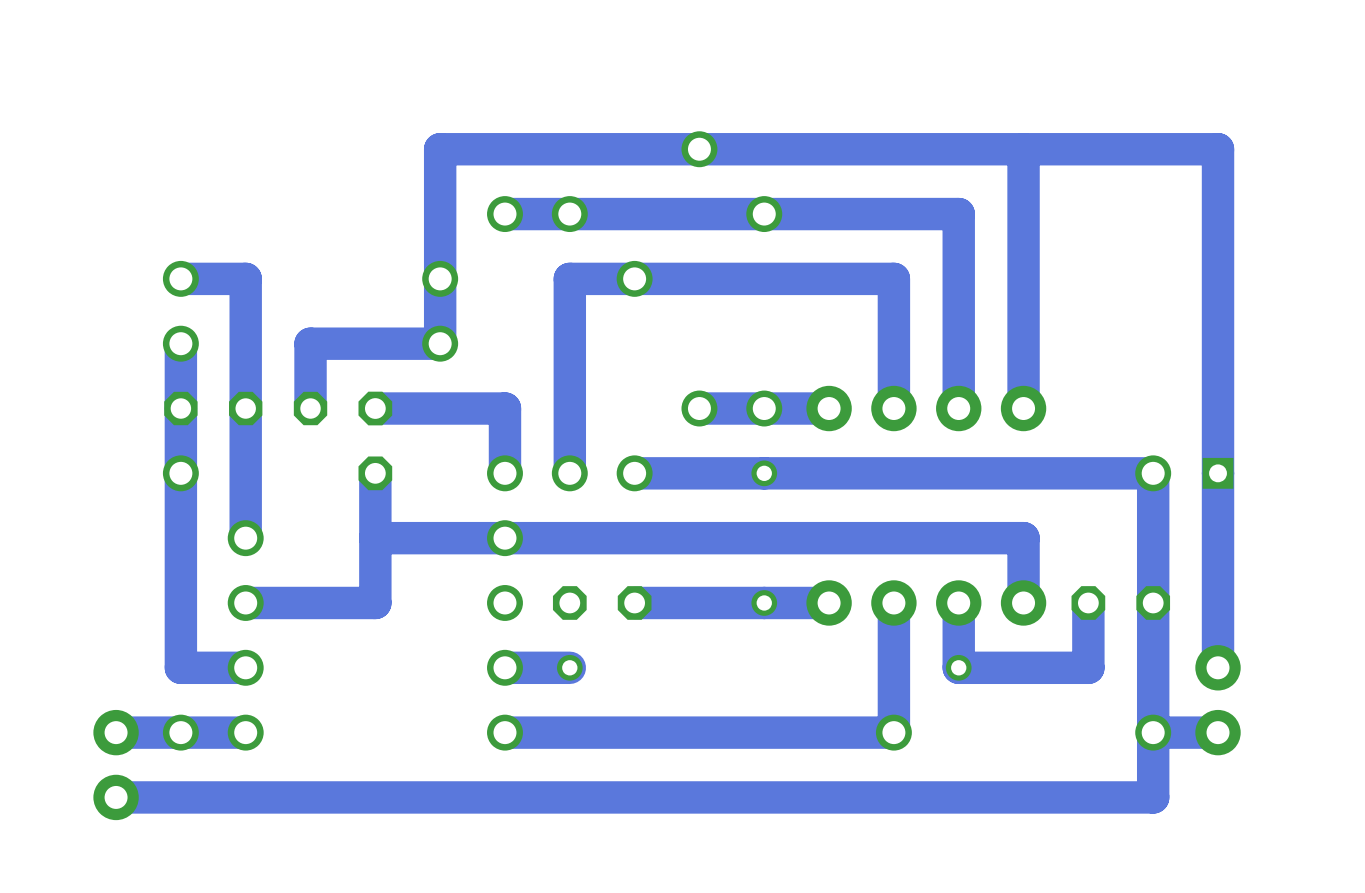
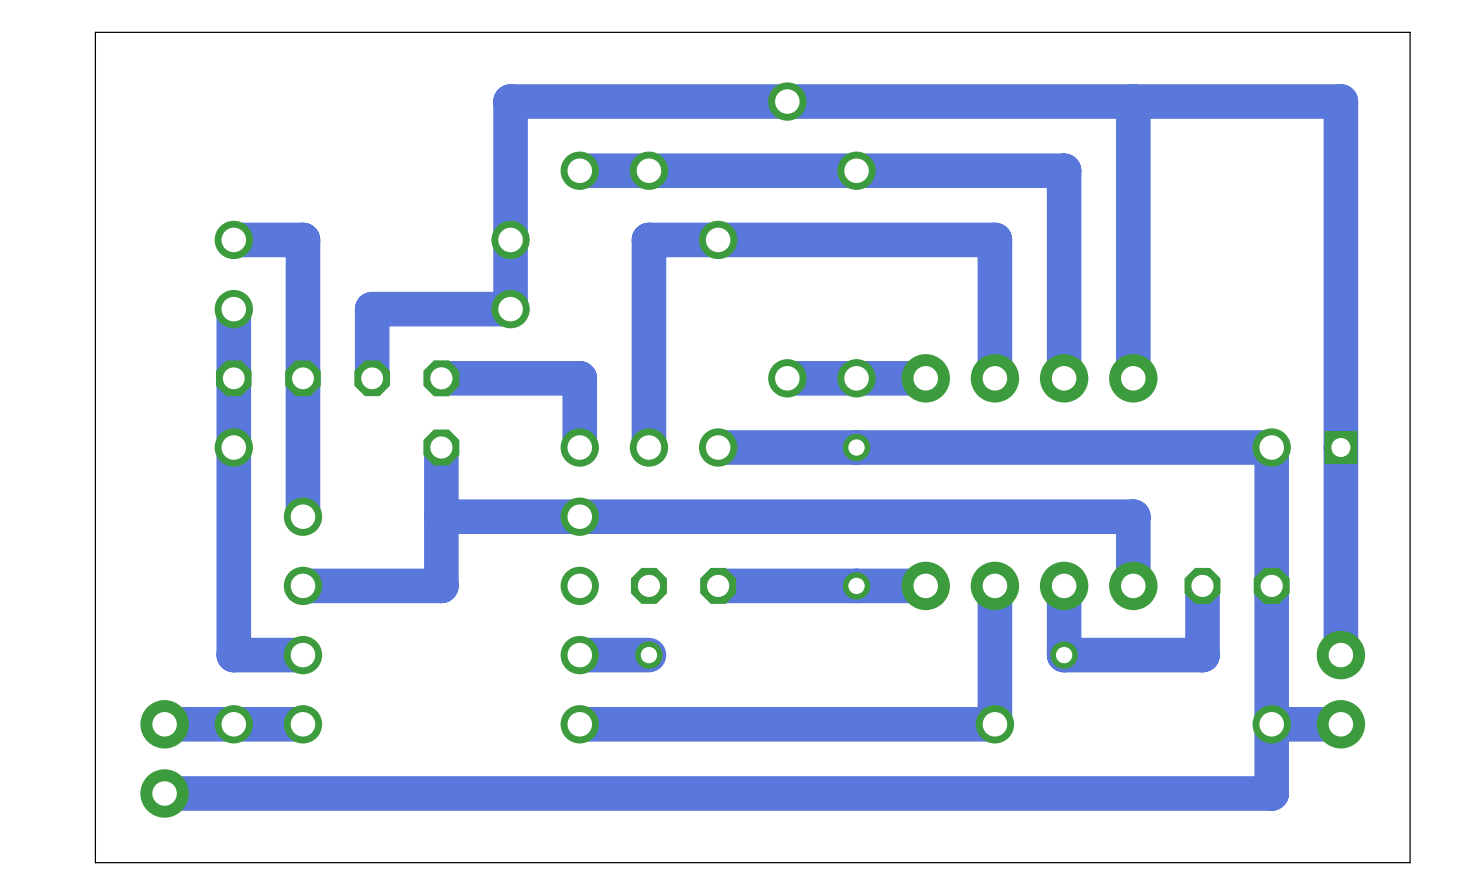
board edge: none -> (1410, 32) (95, 32) (95, 862) (1410, 862) (1410, 32)

